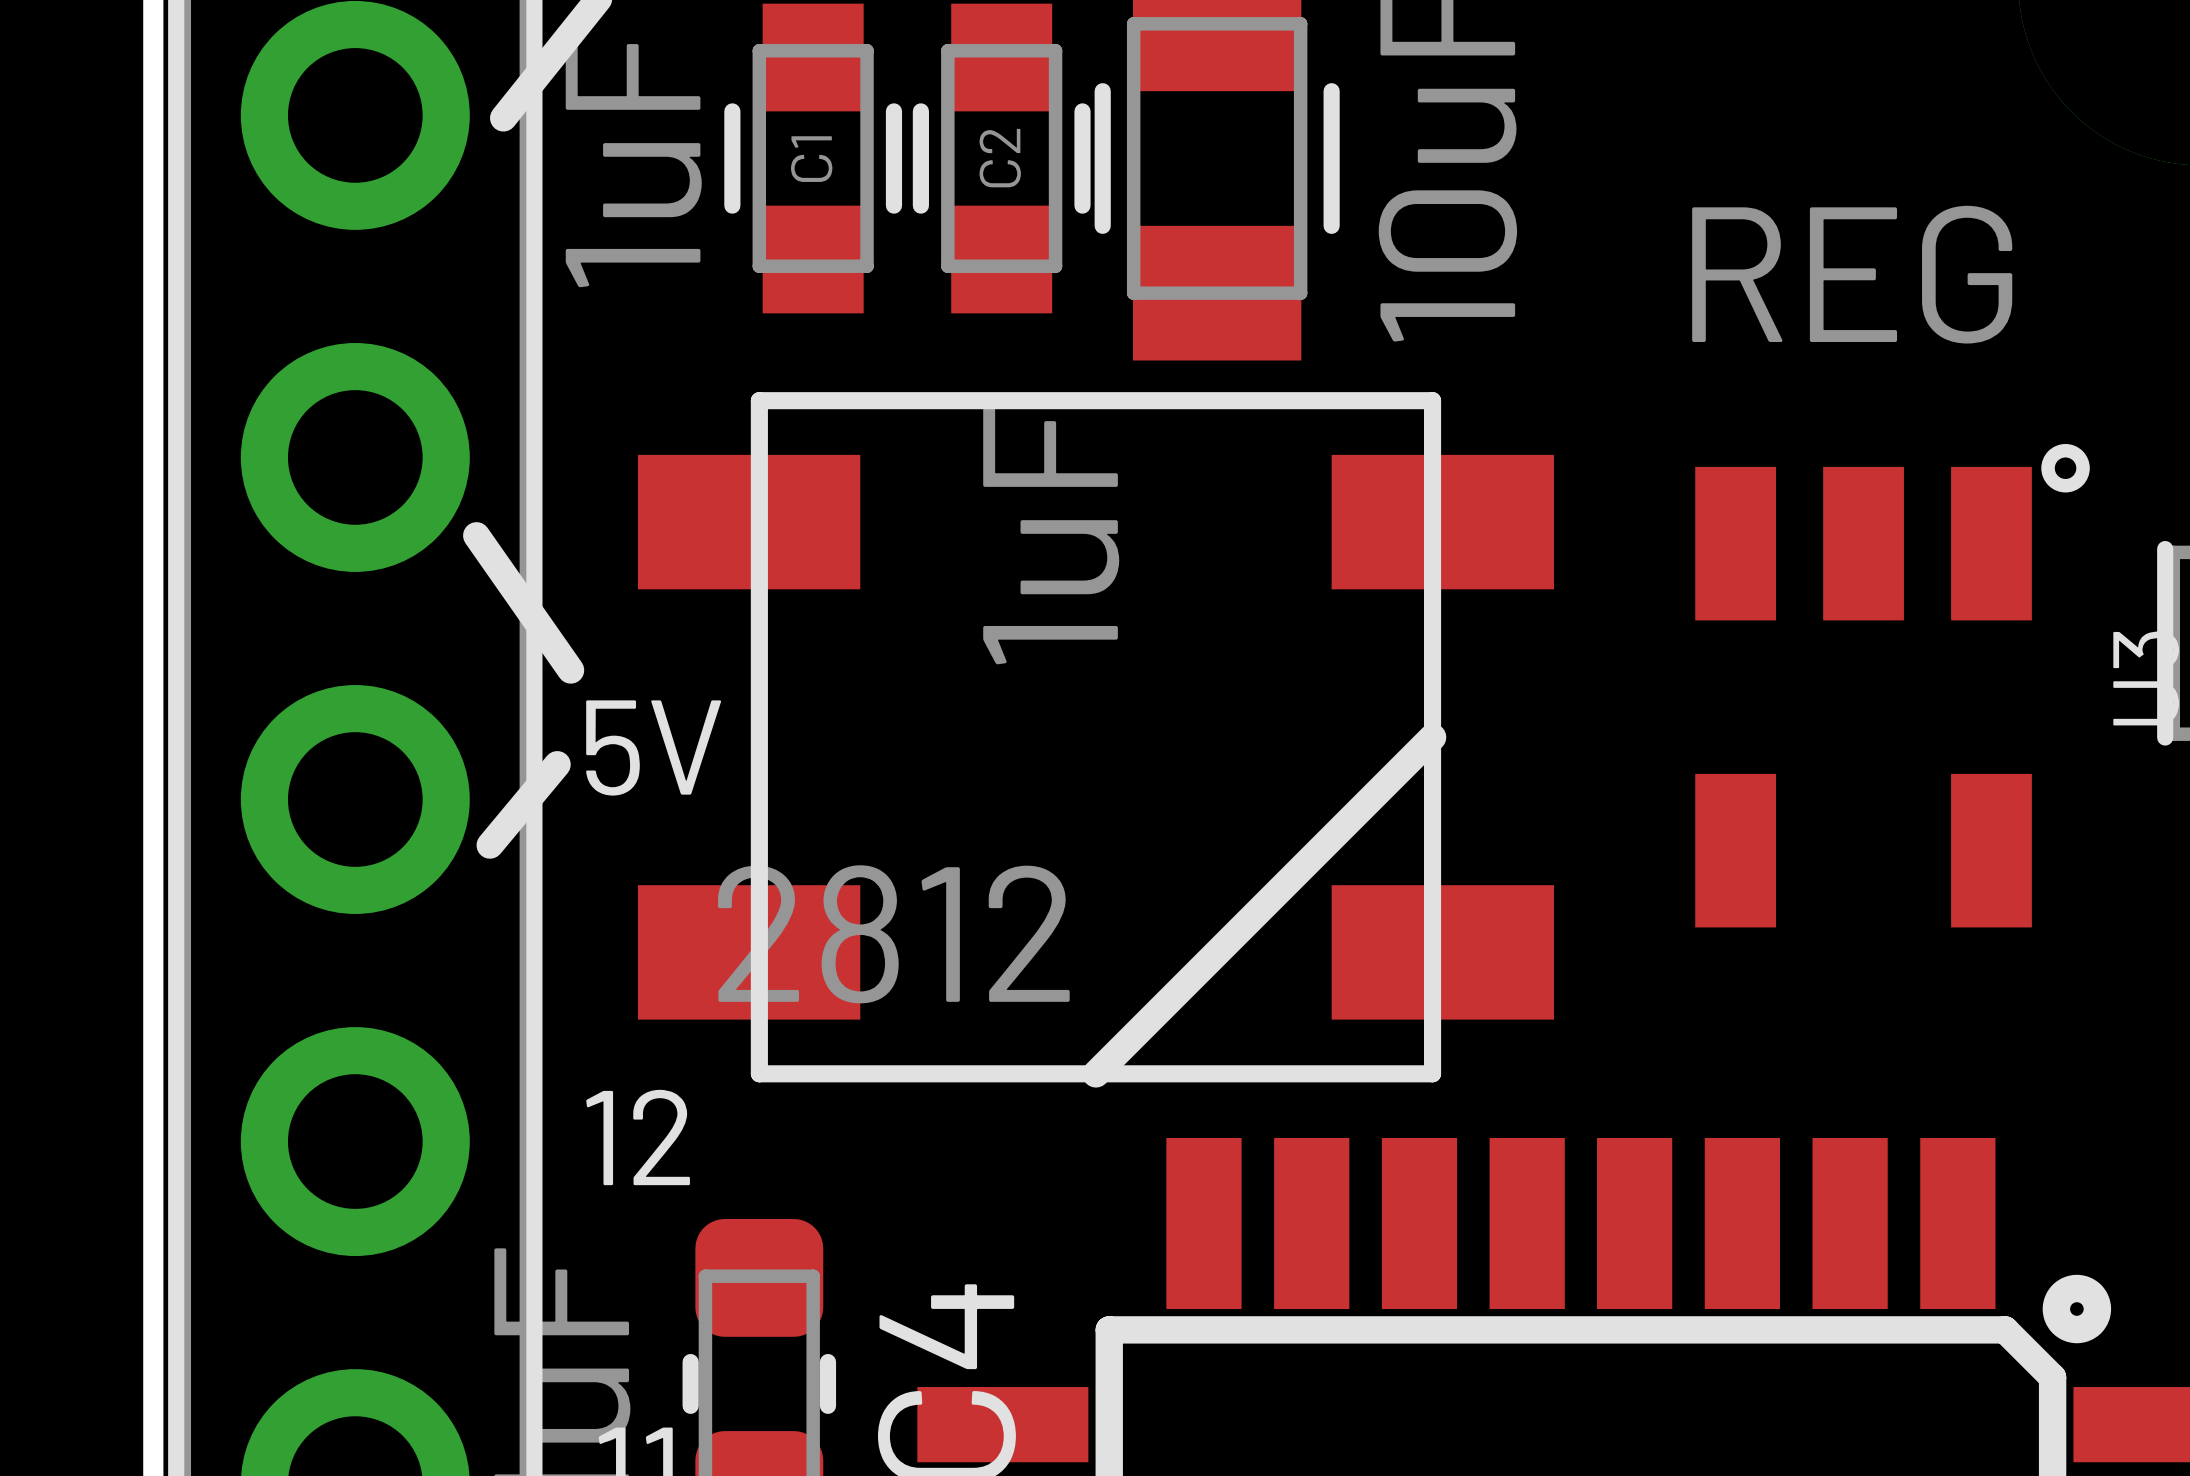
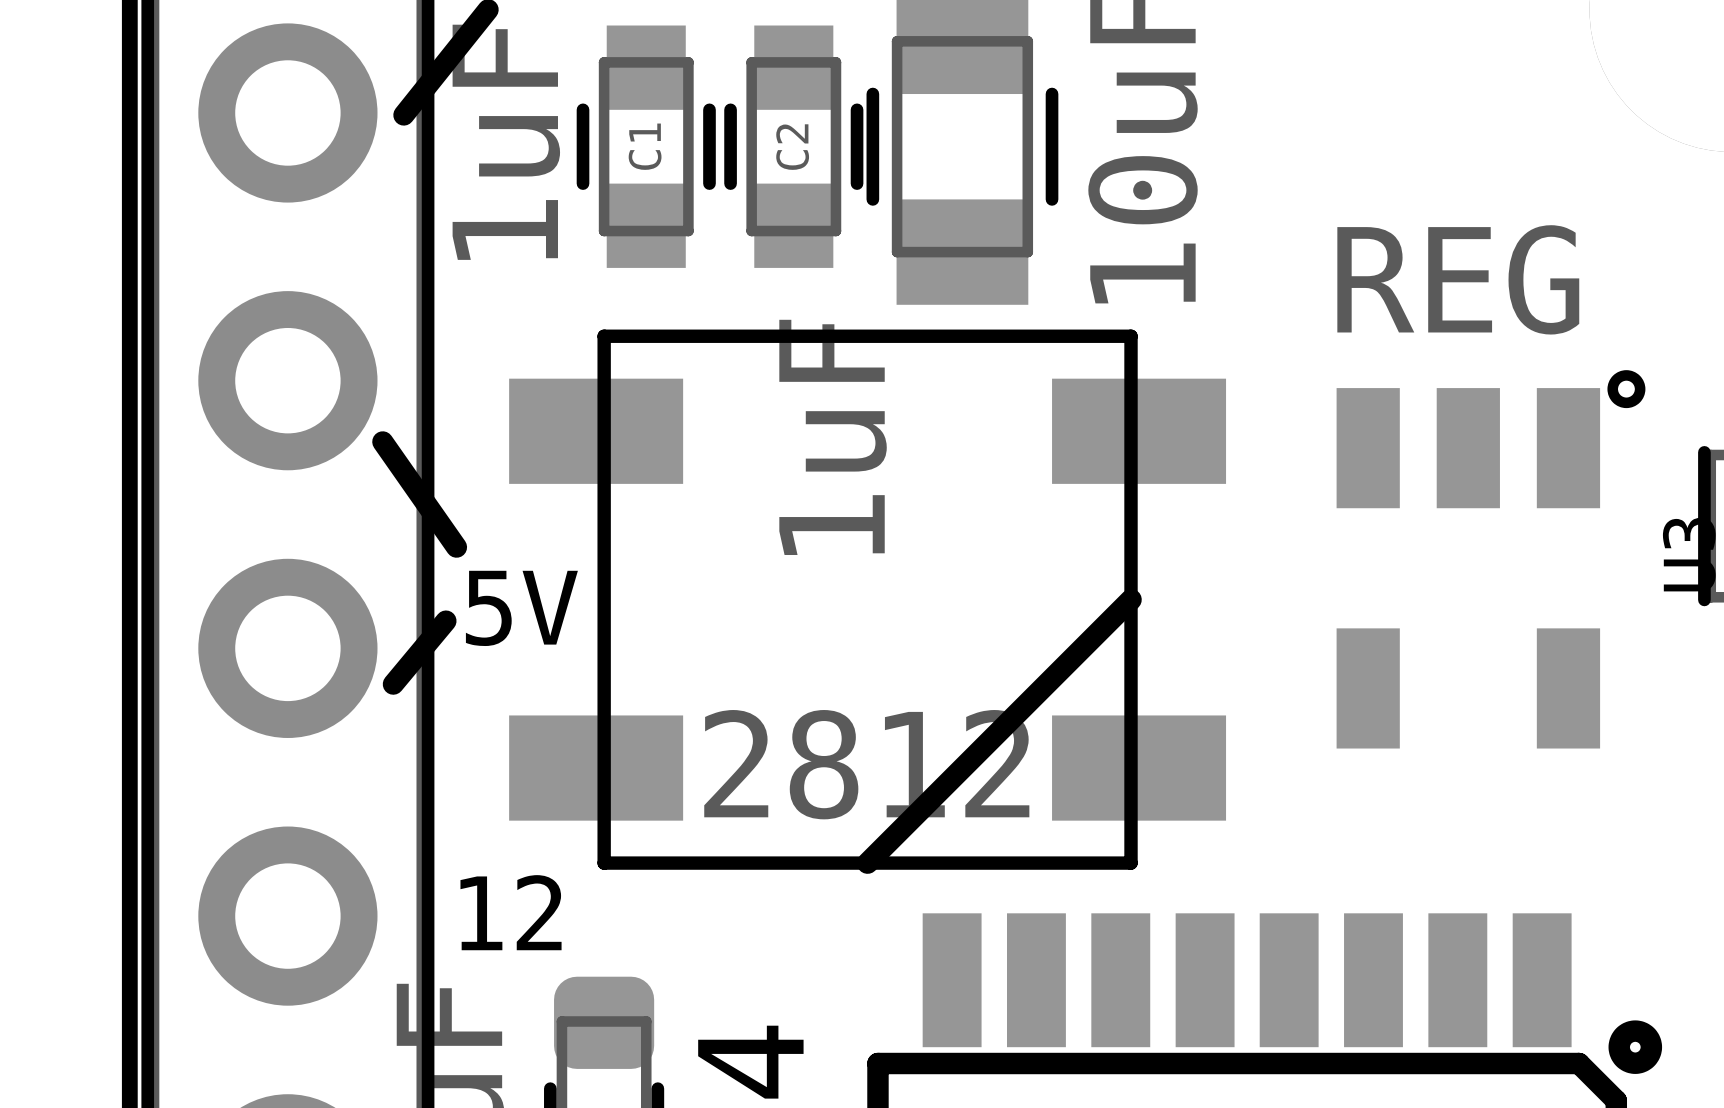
text position: REG (1852, 274) -> REG (1458, 279)
text position: 2812 (893, 934) -> 2812 (866, 764)

